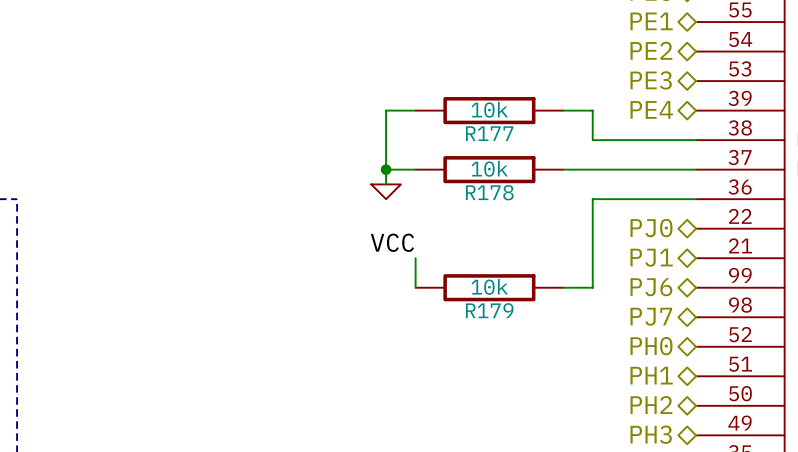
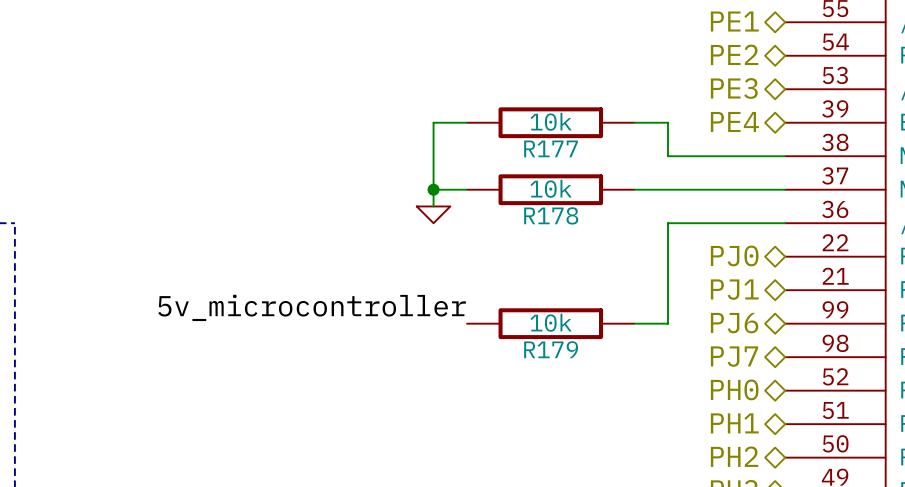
label: VCC (392, 242) -> none
wire: (415, 258) (415, 287) -> none
label: none -> 5v_microcontroller (312, 307)

